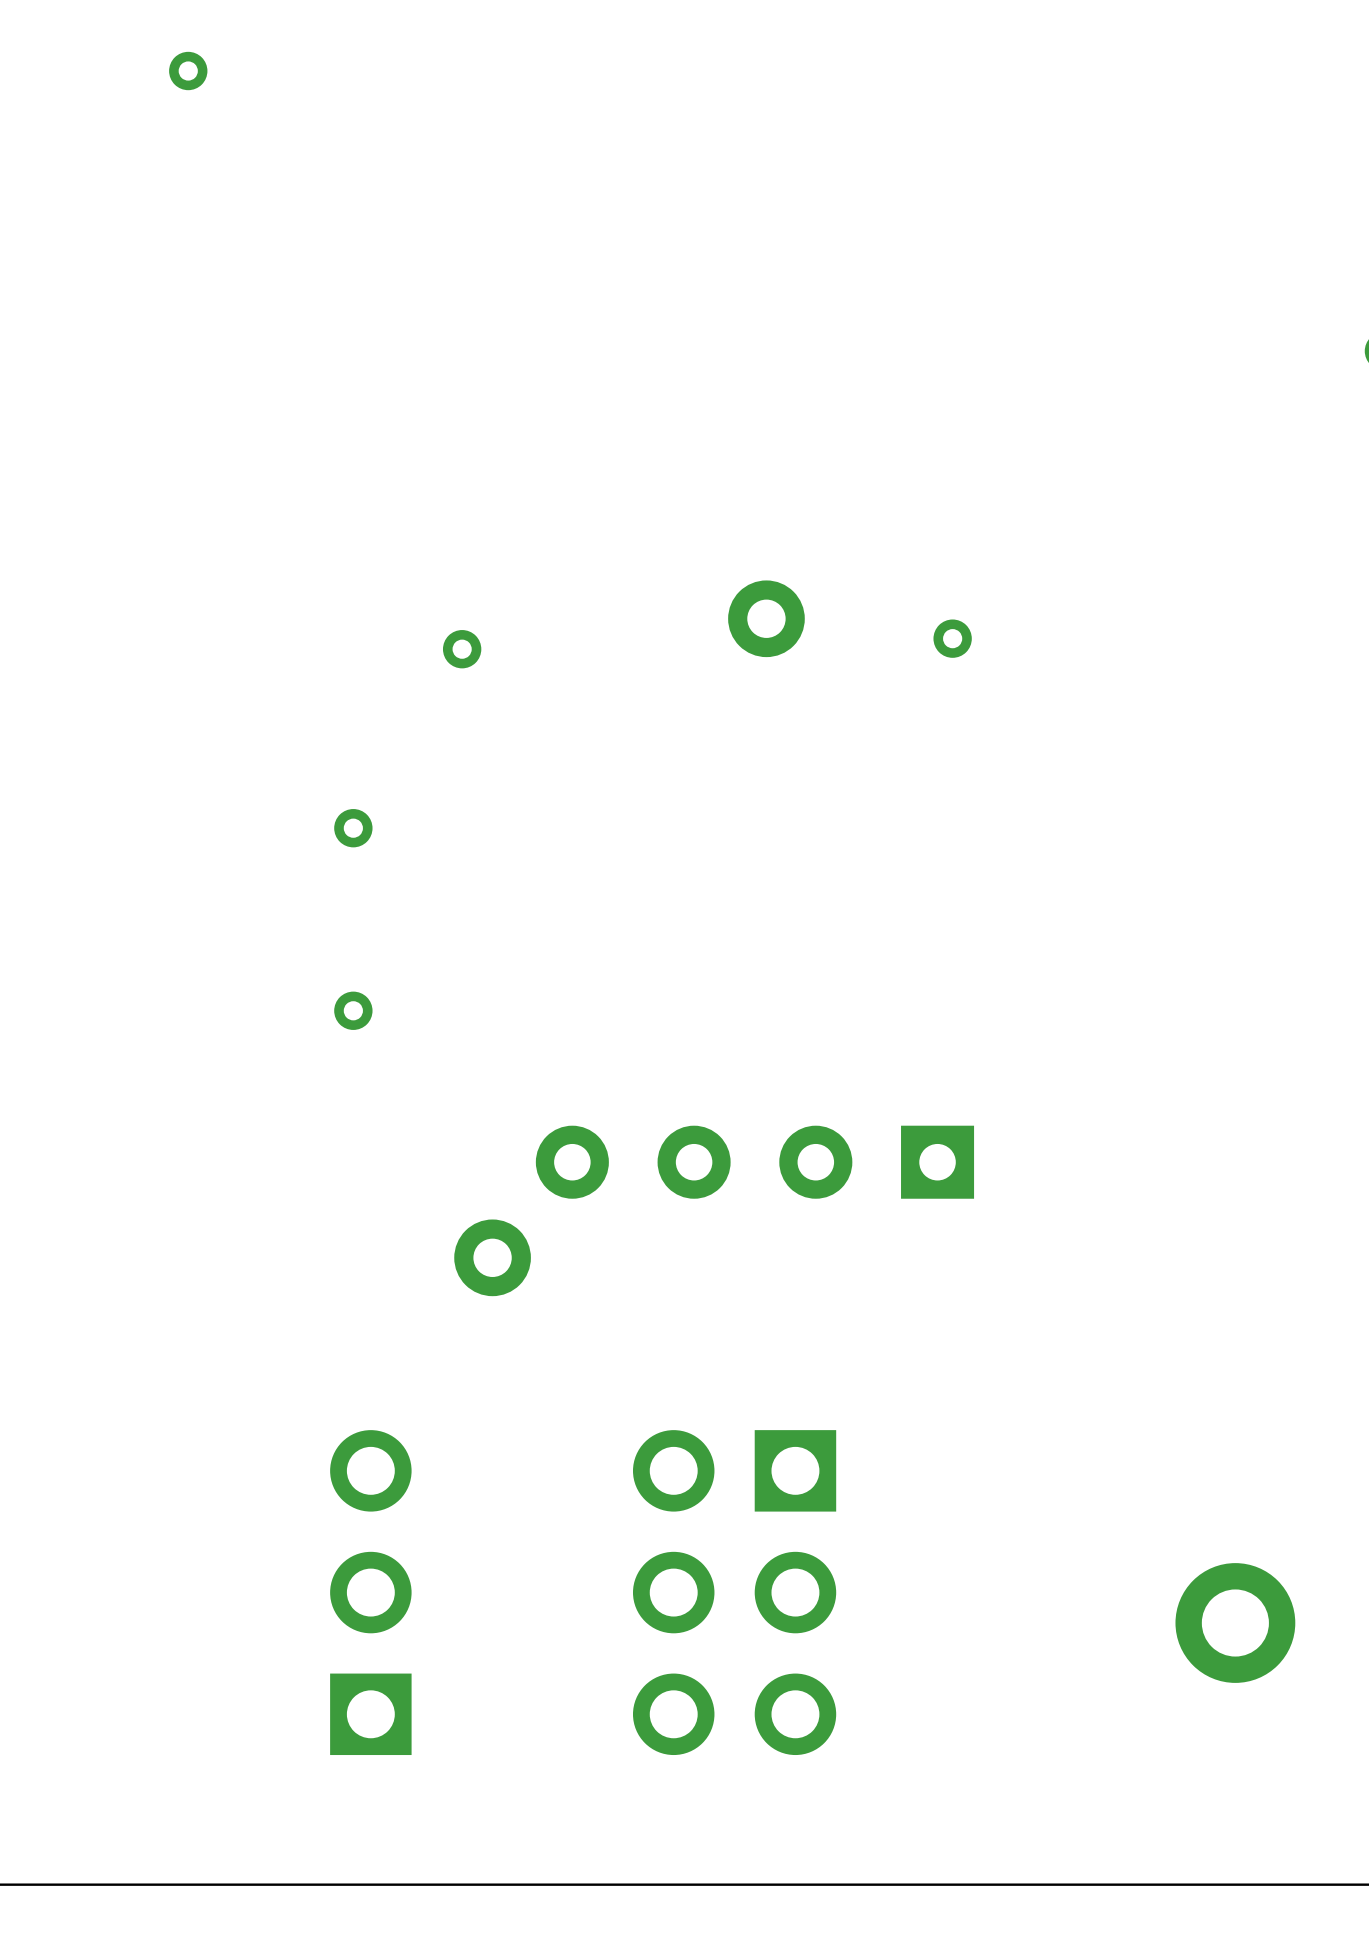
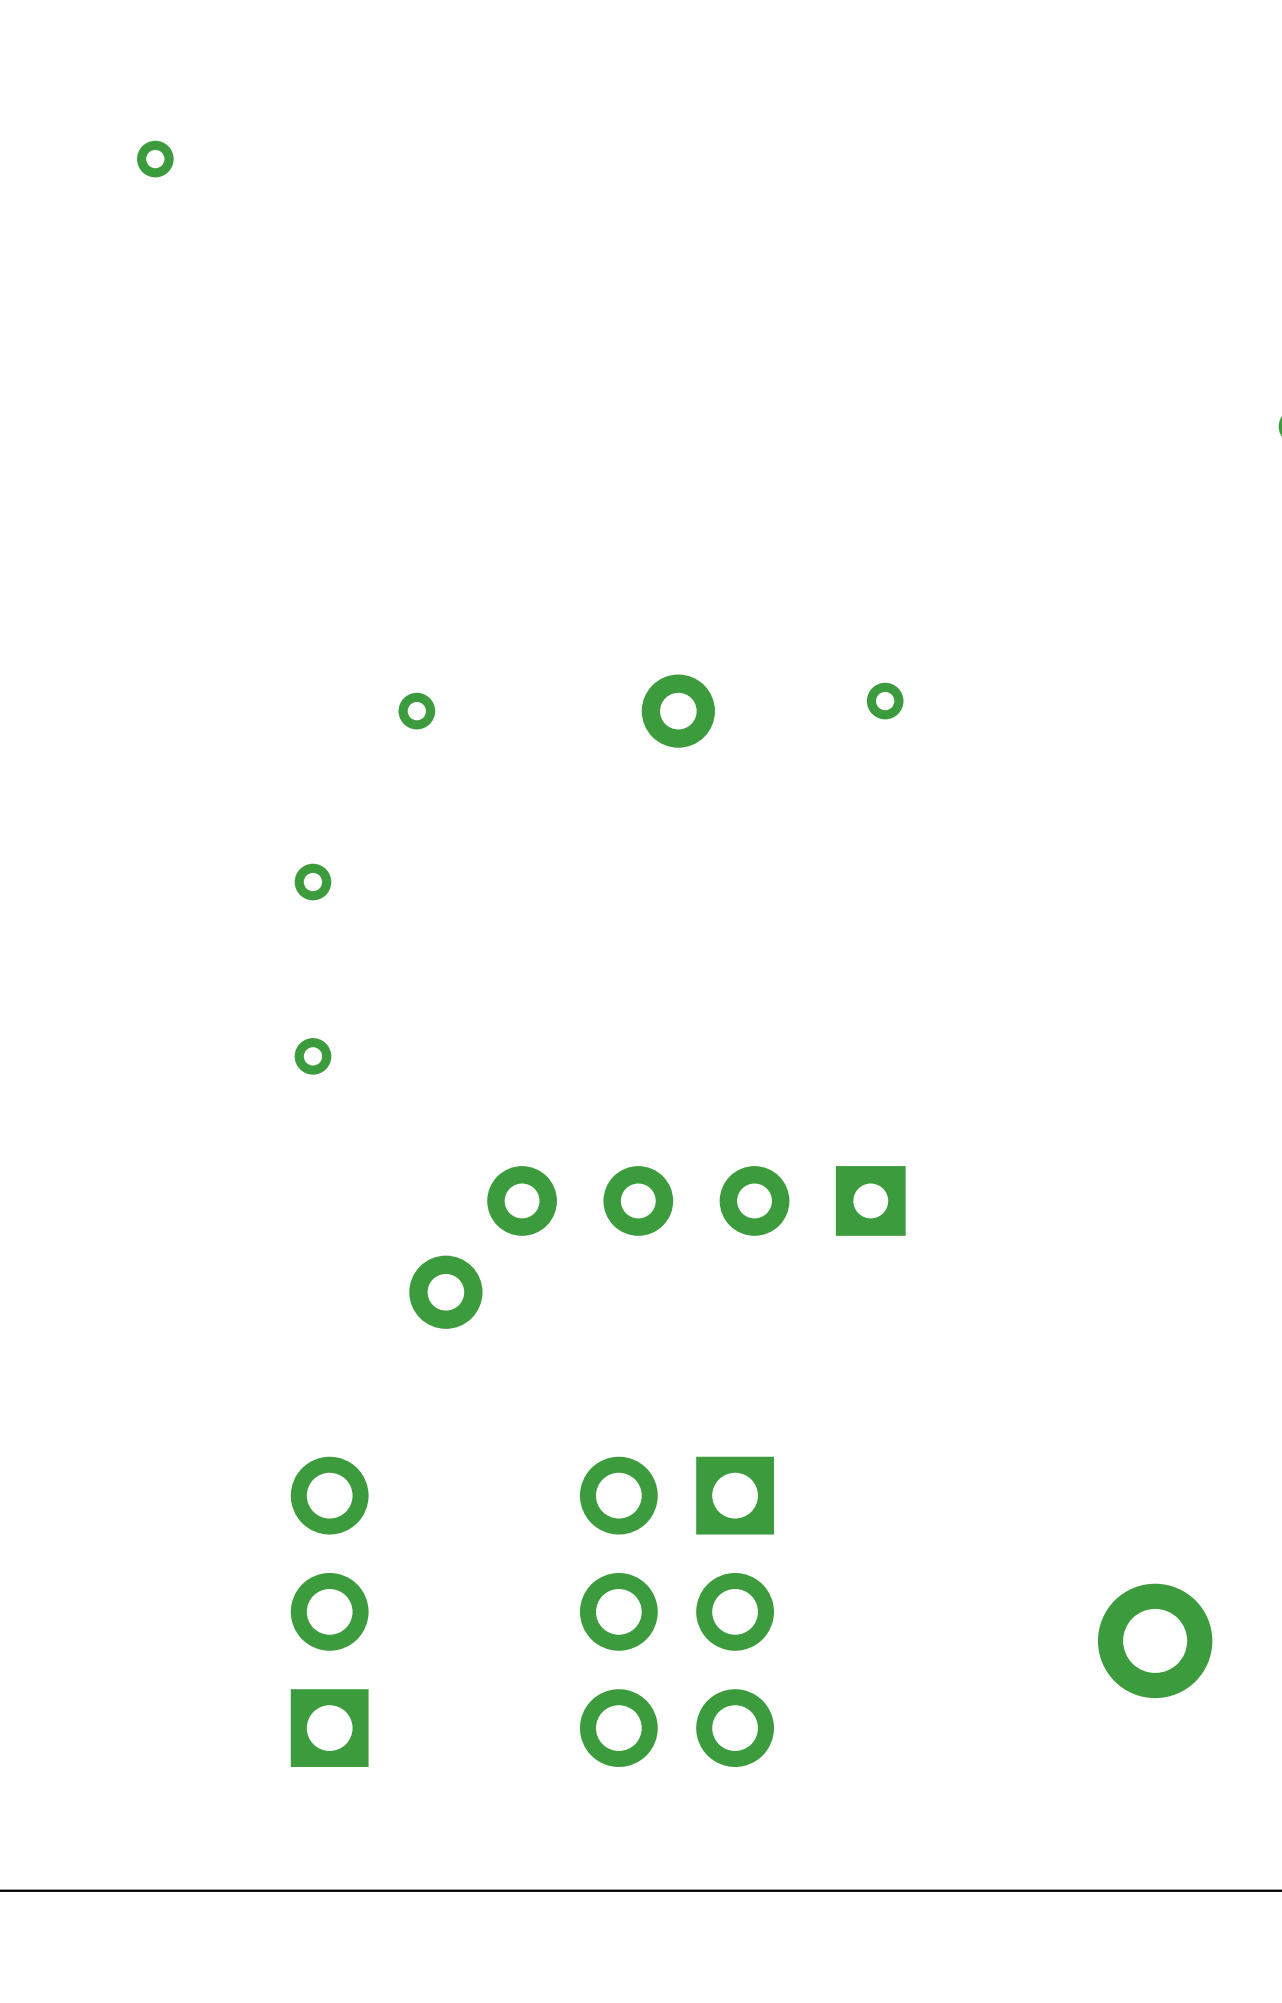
via position: (766, 618) -> (678, 711)

